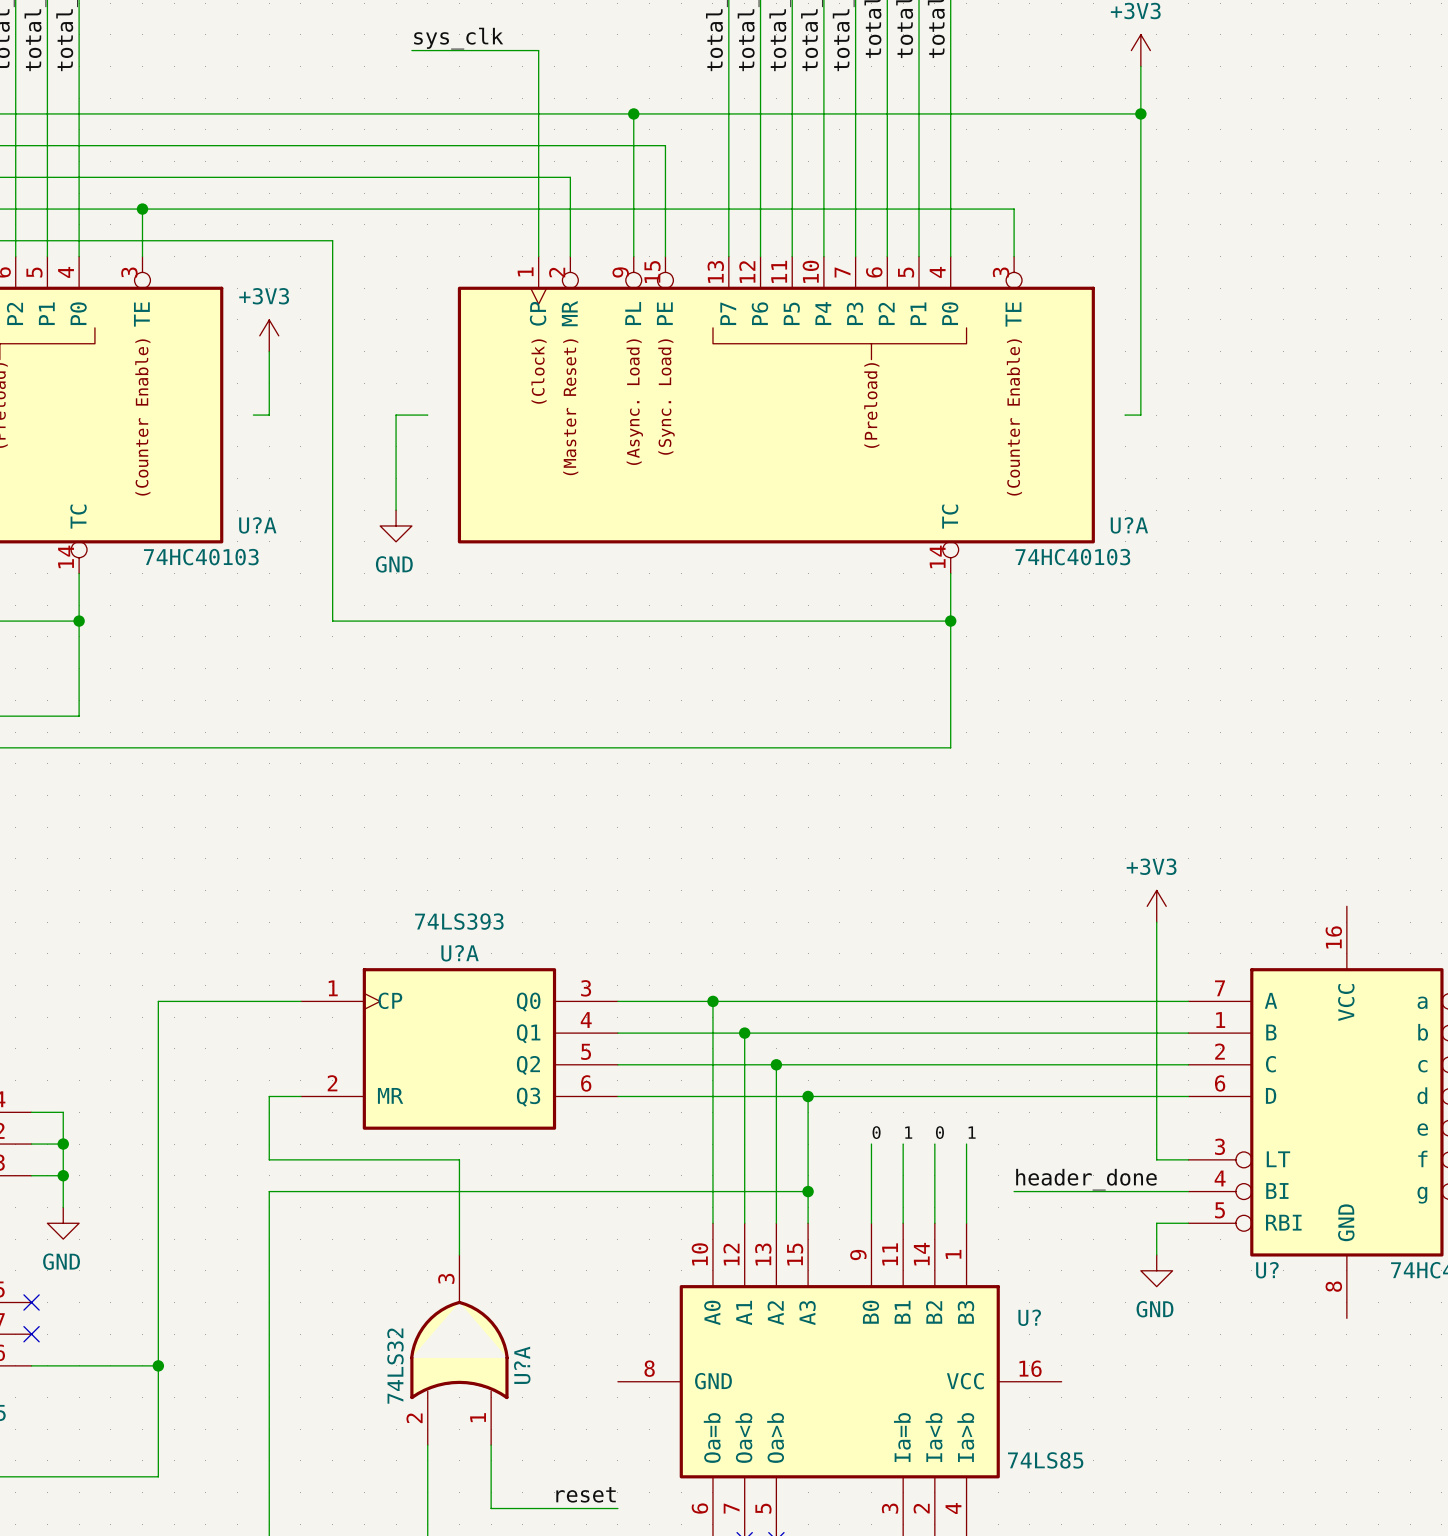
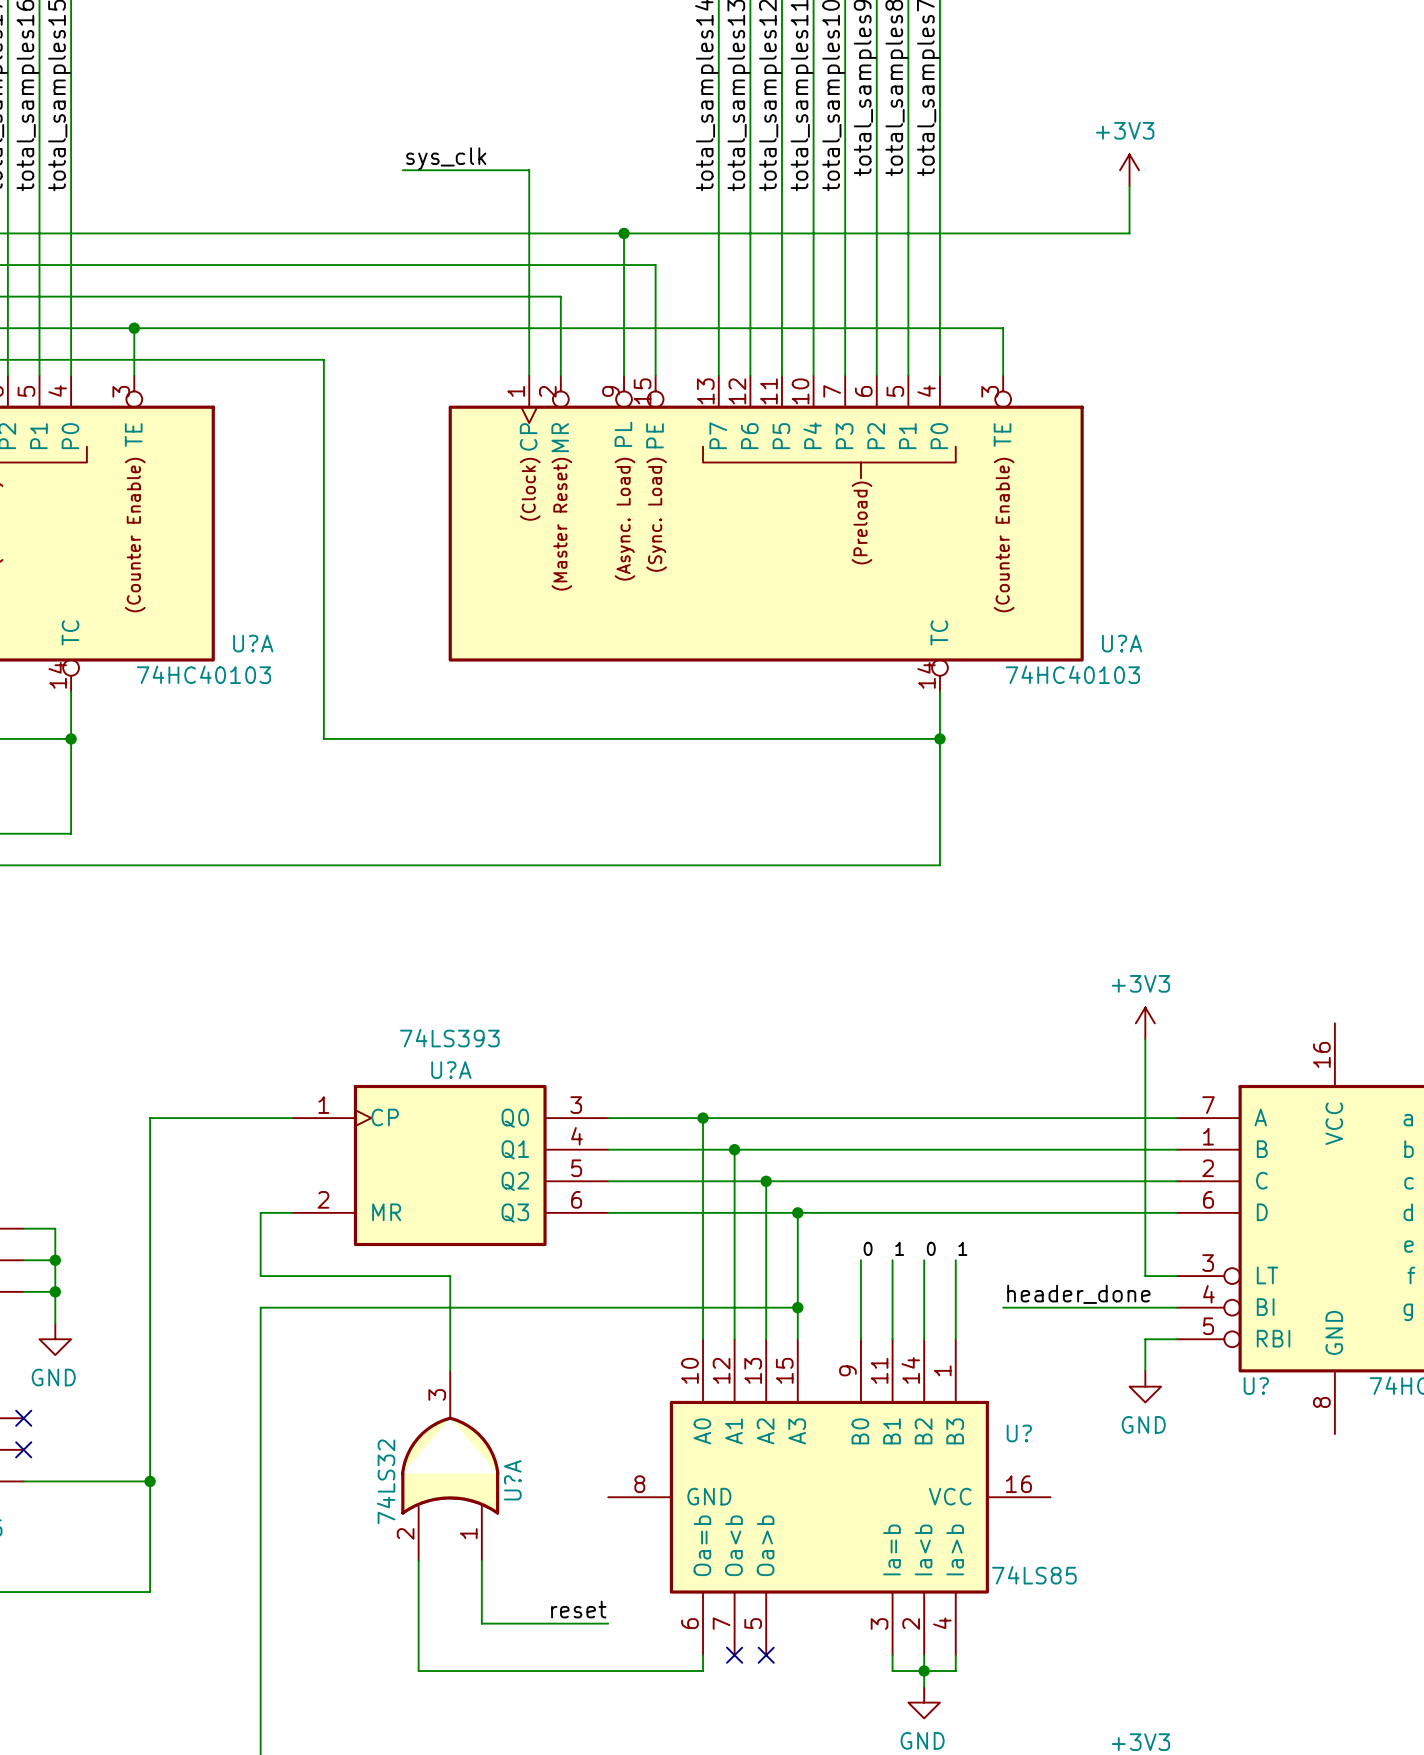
wire: (1140, 113) (1140, 415) (1125, 415) -> none
junction: (1140, 113) -> none
power symbol: +3V3 (269, 335) -> none
wire: (269, 351) (269, 415) (253, 415) -> none
wire: (427, 415) (396, 415) (396, 510) -> none
power symbol: GND (396, 525) -> none

